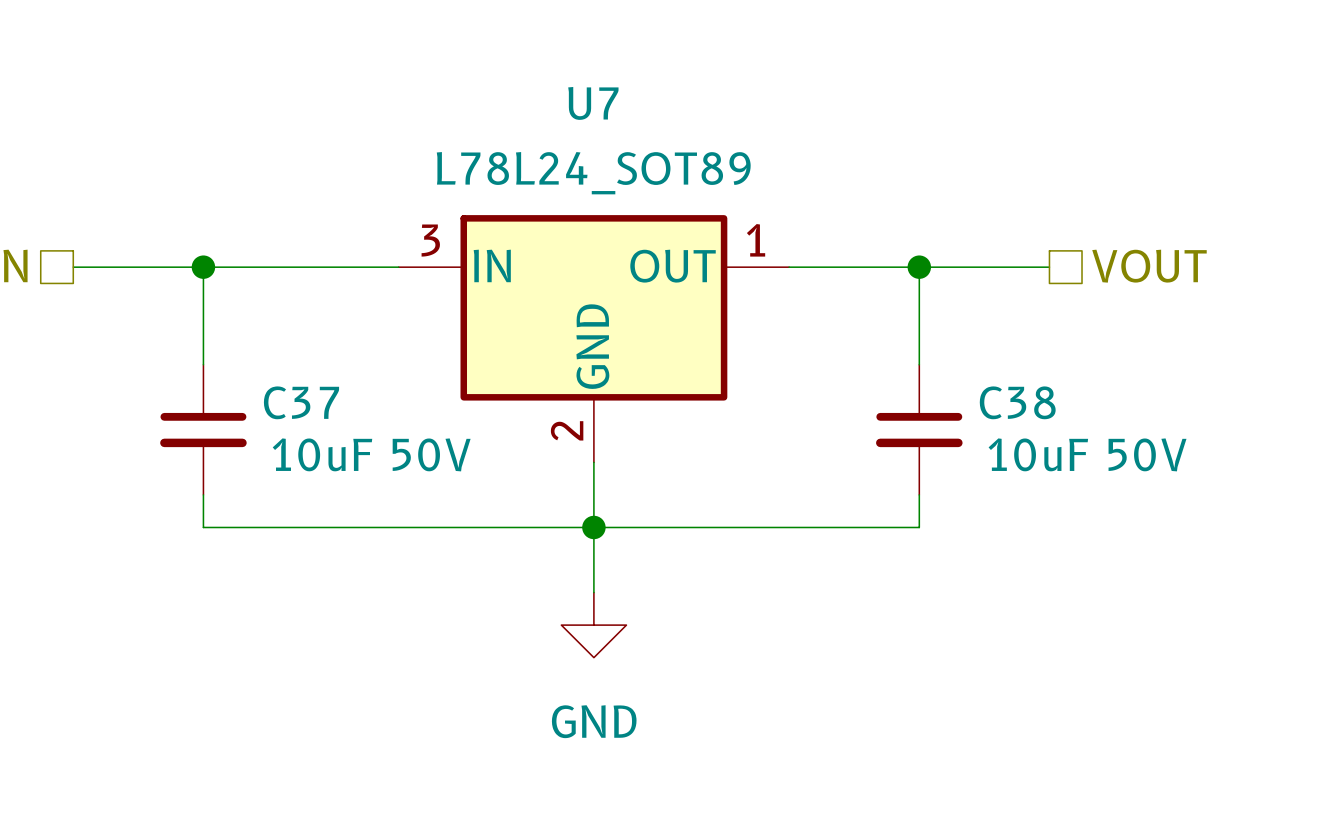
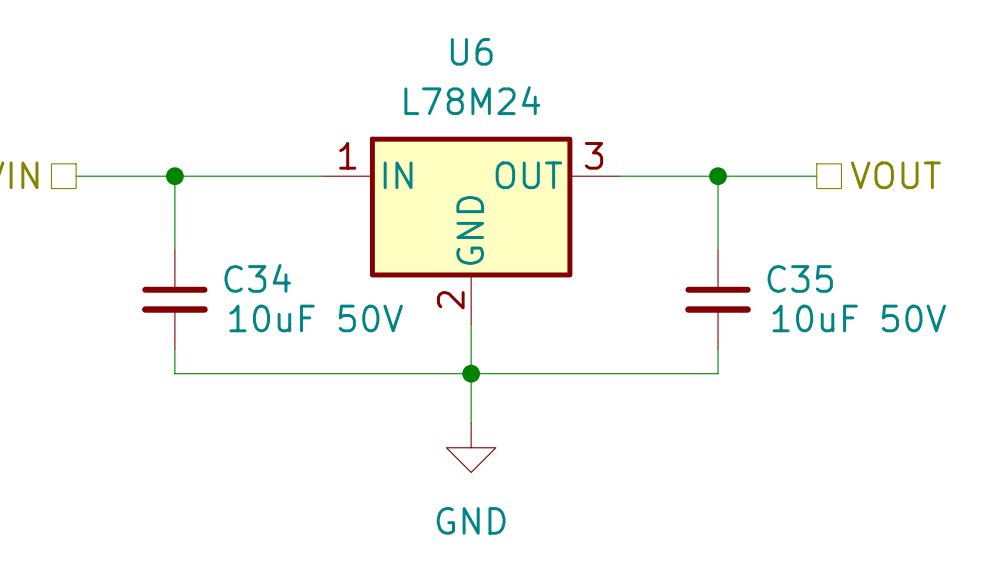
U7 name: U7 (593, 103) -> U6 (471, 51)
U7 value: L78L24_SOT89 (593, 173) -> L78M24 (472, 100)
U7 pin number: 3 (430, 240) -> 1 (347, 155)
U7 pin number: 1 (756, 240) -> 3 (593, 155)
C37 name: C37 (301, 402) -> C34 (257, 278)
C38 name: C38 (1017, 402) -> C35 (800, 278)

